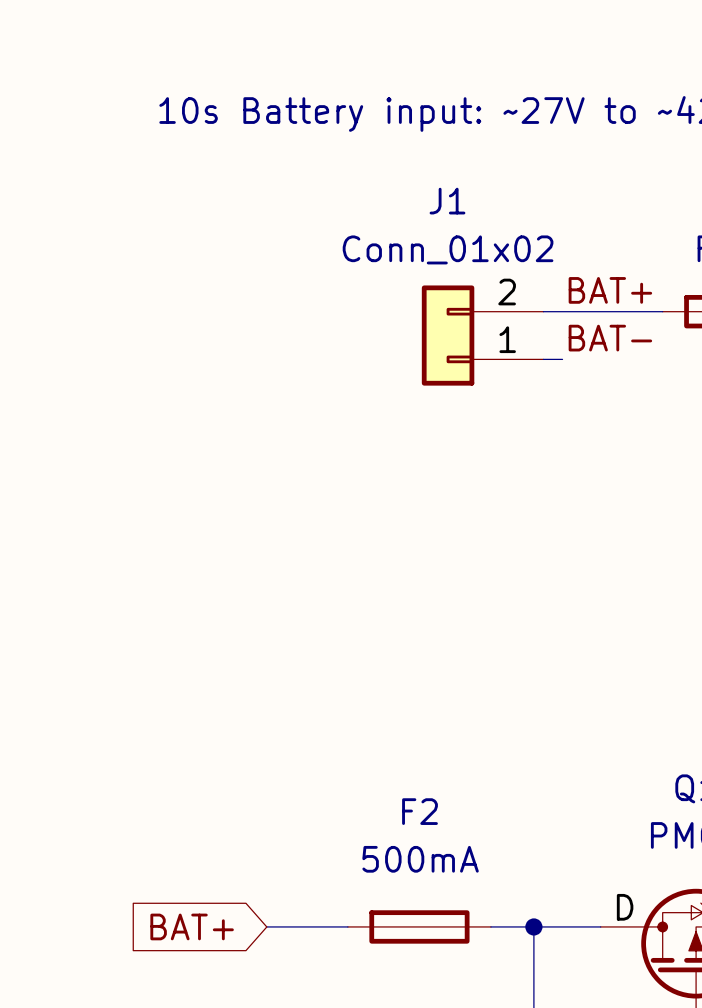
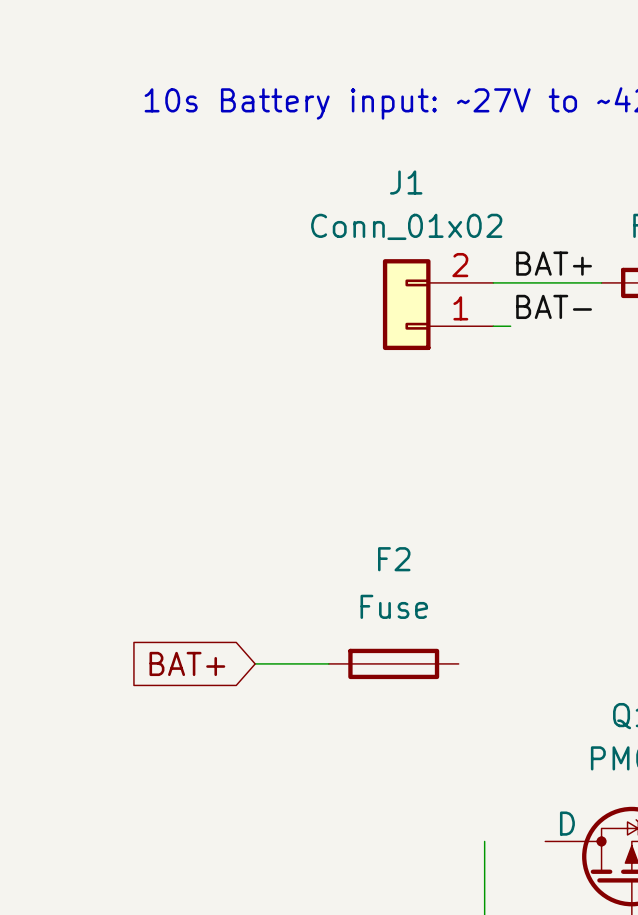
F2 value: 500mA (420, 859) -> Fuse (394, 606)
global label position: BAT+ (192, 926) -> BAT+ (187, 663)
wire: (266, 926) (347, 926) -> (255, 663) (328, 663)
F2 position: (419, 926) -> (393, 663)
wire: (490, 926) (600, 926) -> none
junction: (533, 926) -> none

